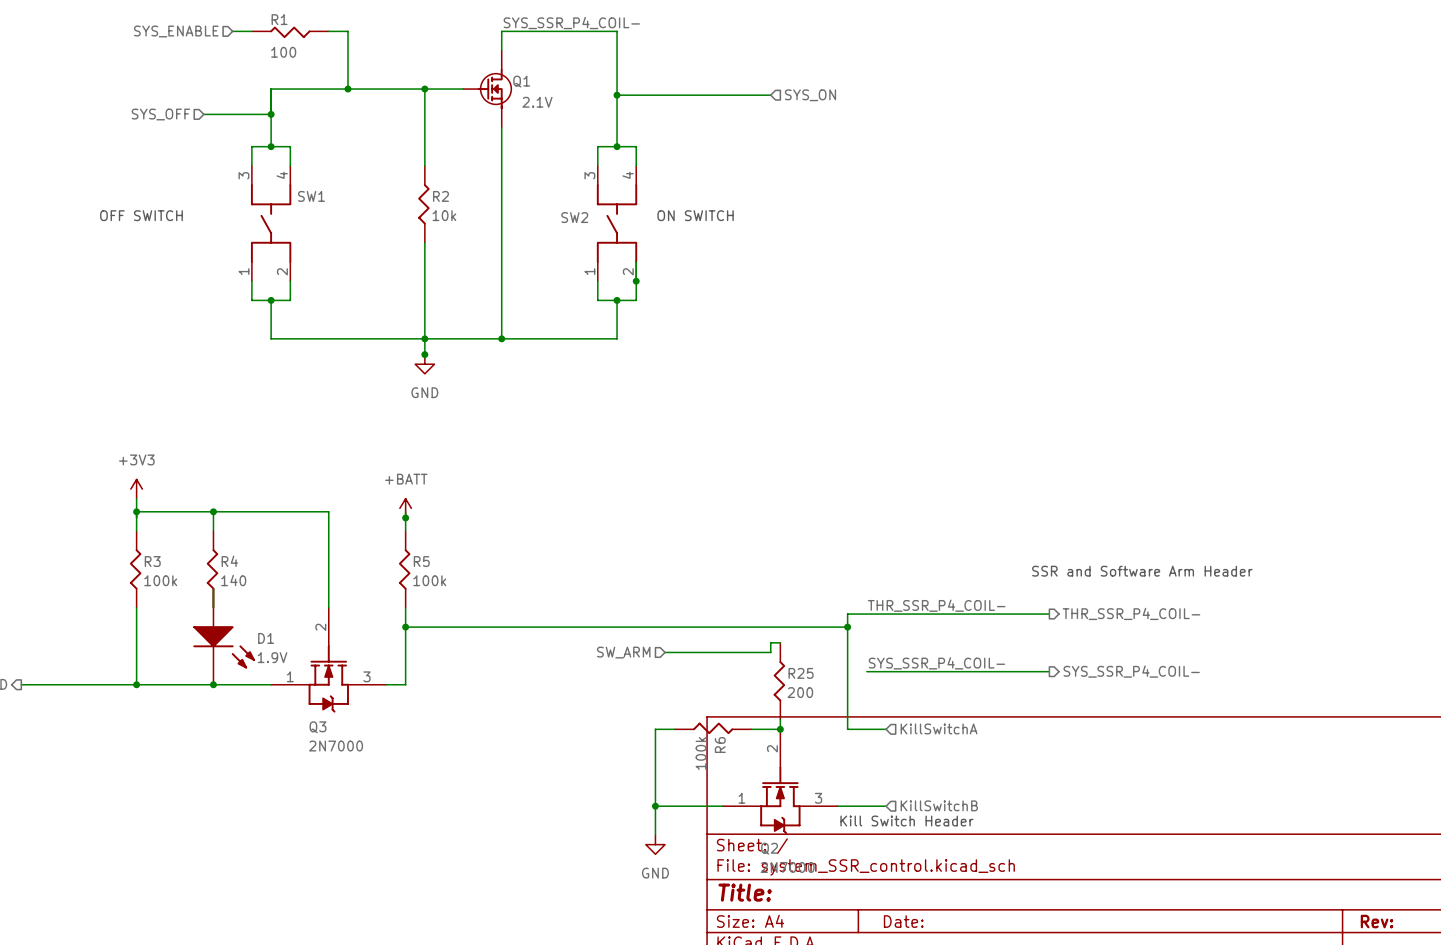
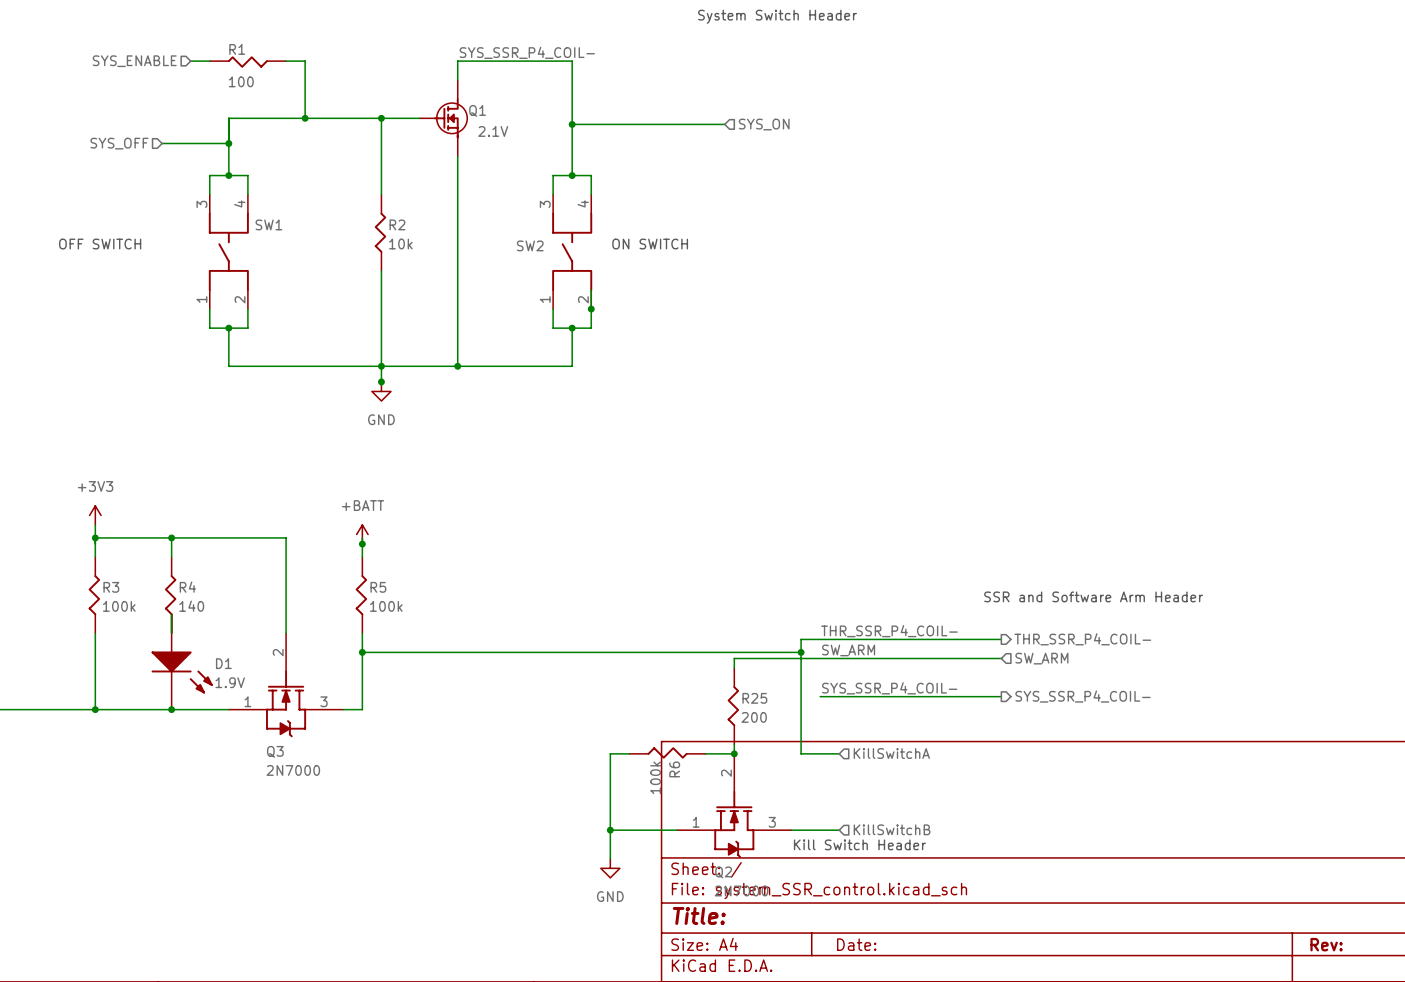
label: none -> SW_ARM (848, 650)
hierarchical label: none -> SW_ARM (1041, 658)
wire: (780, 642) (770, 642) (770, 652) (665, 652) -> (734, 668) (734, 658) (1001, 658)
hierarchical label: SW_ARM (623, 652) -> none

